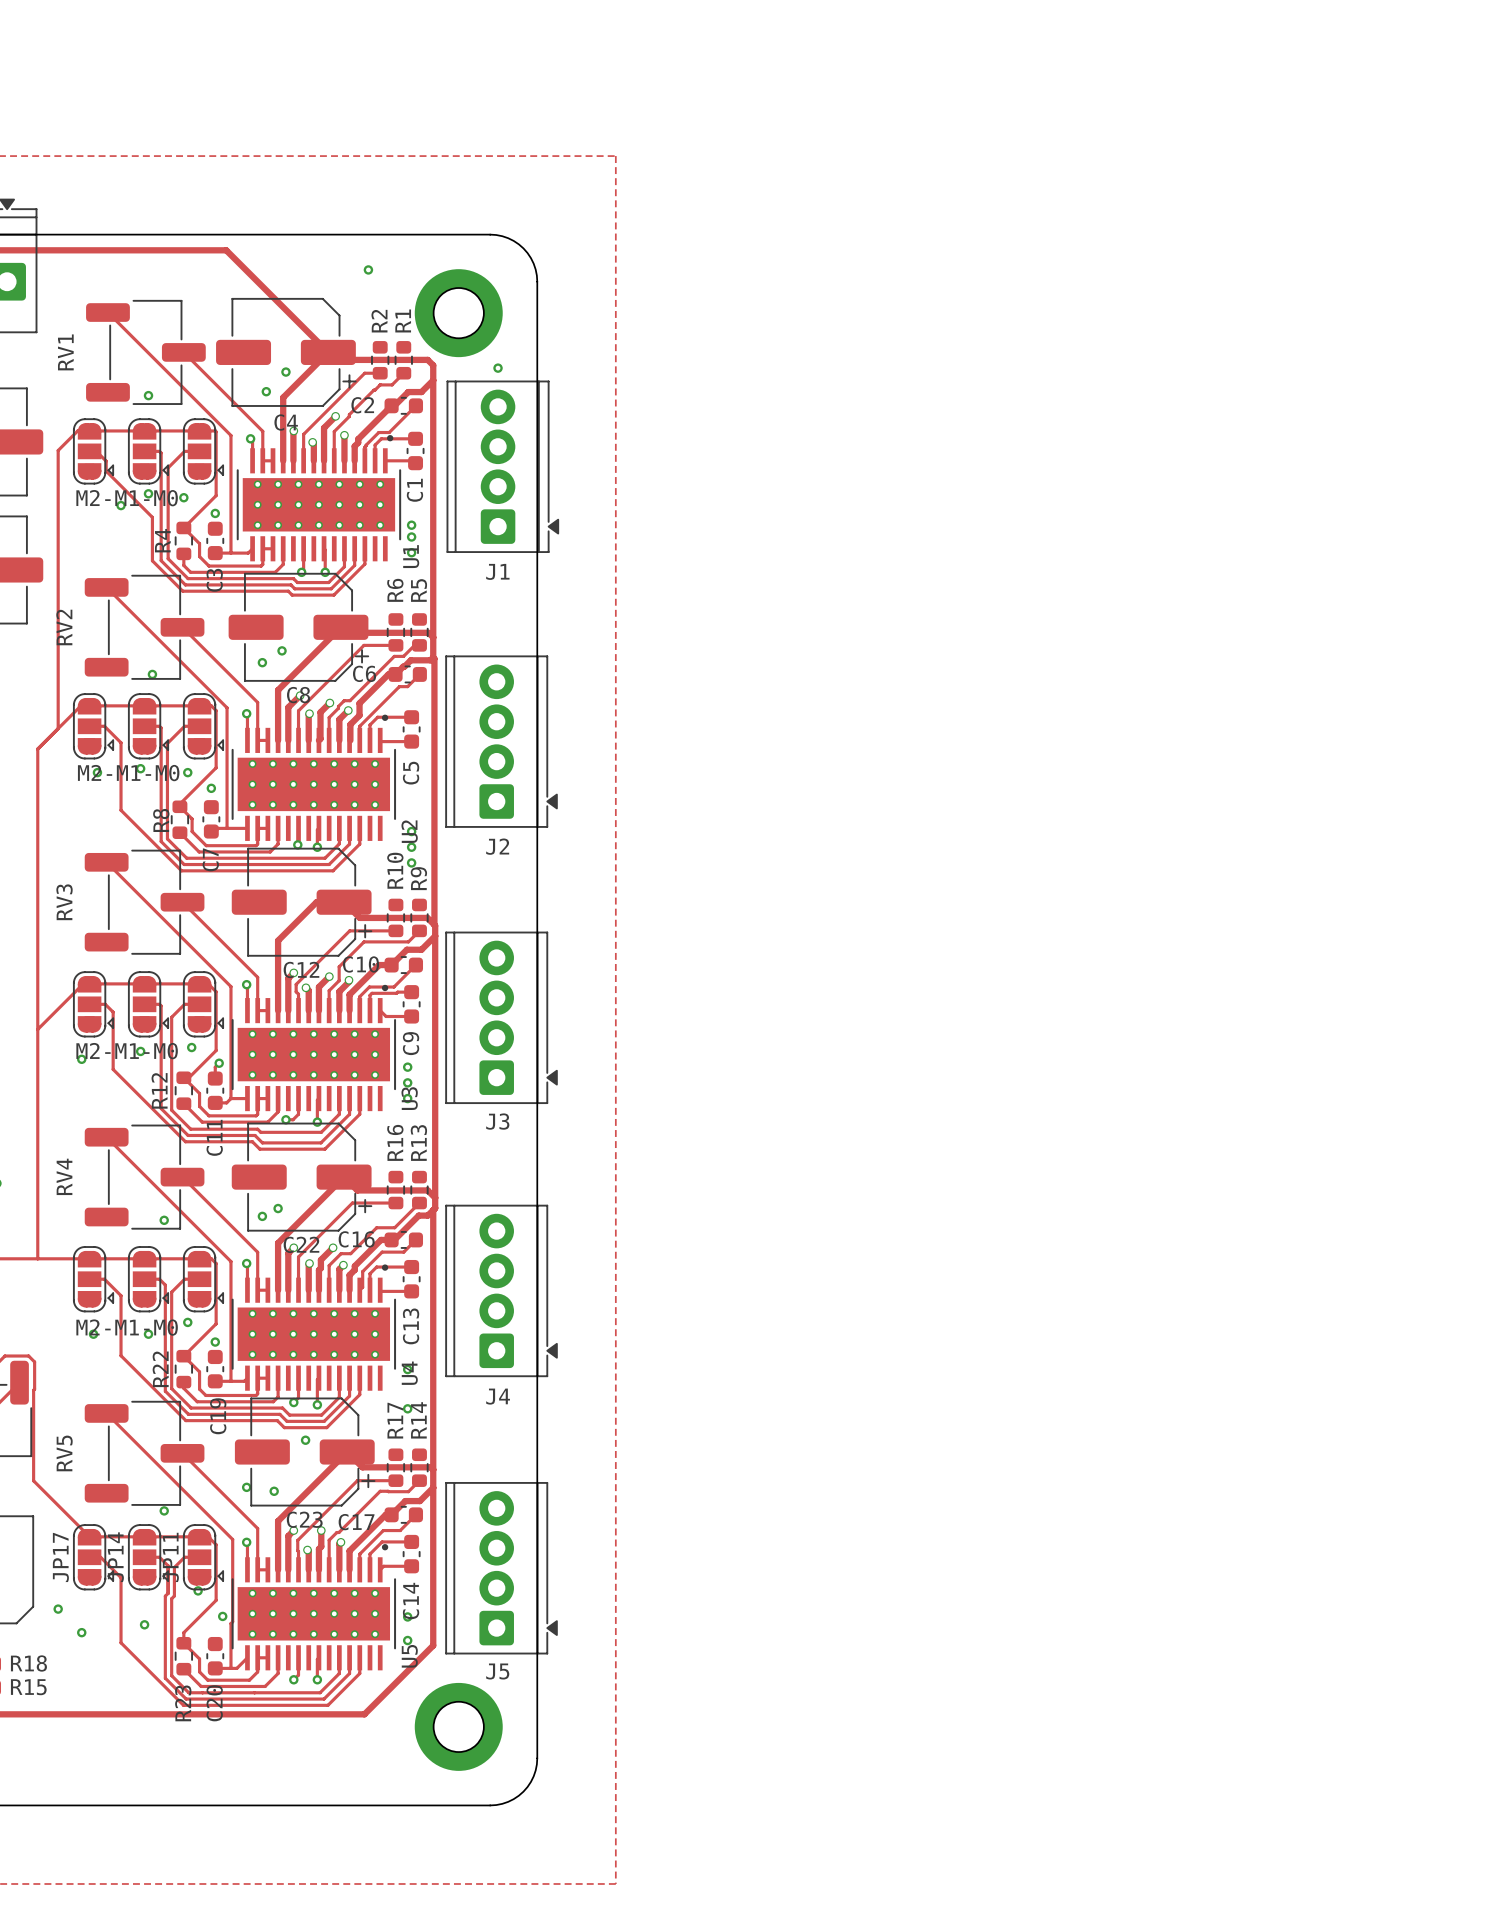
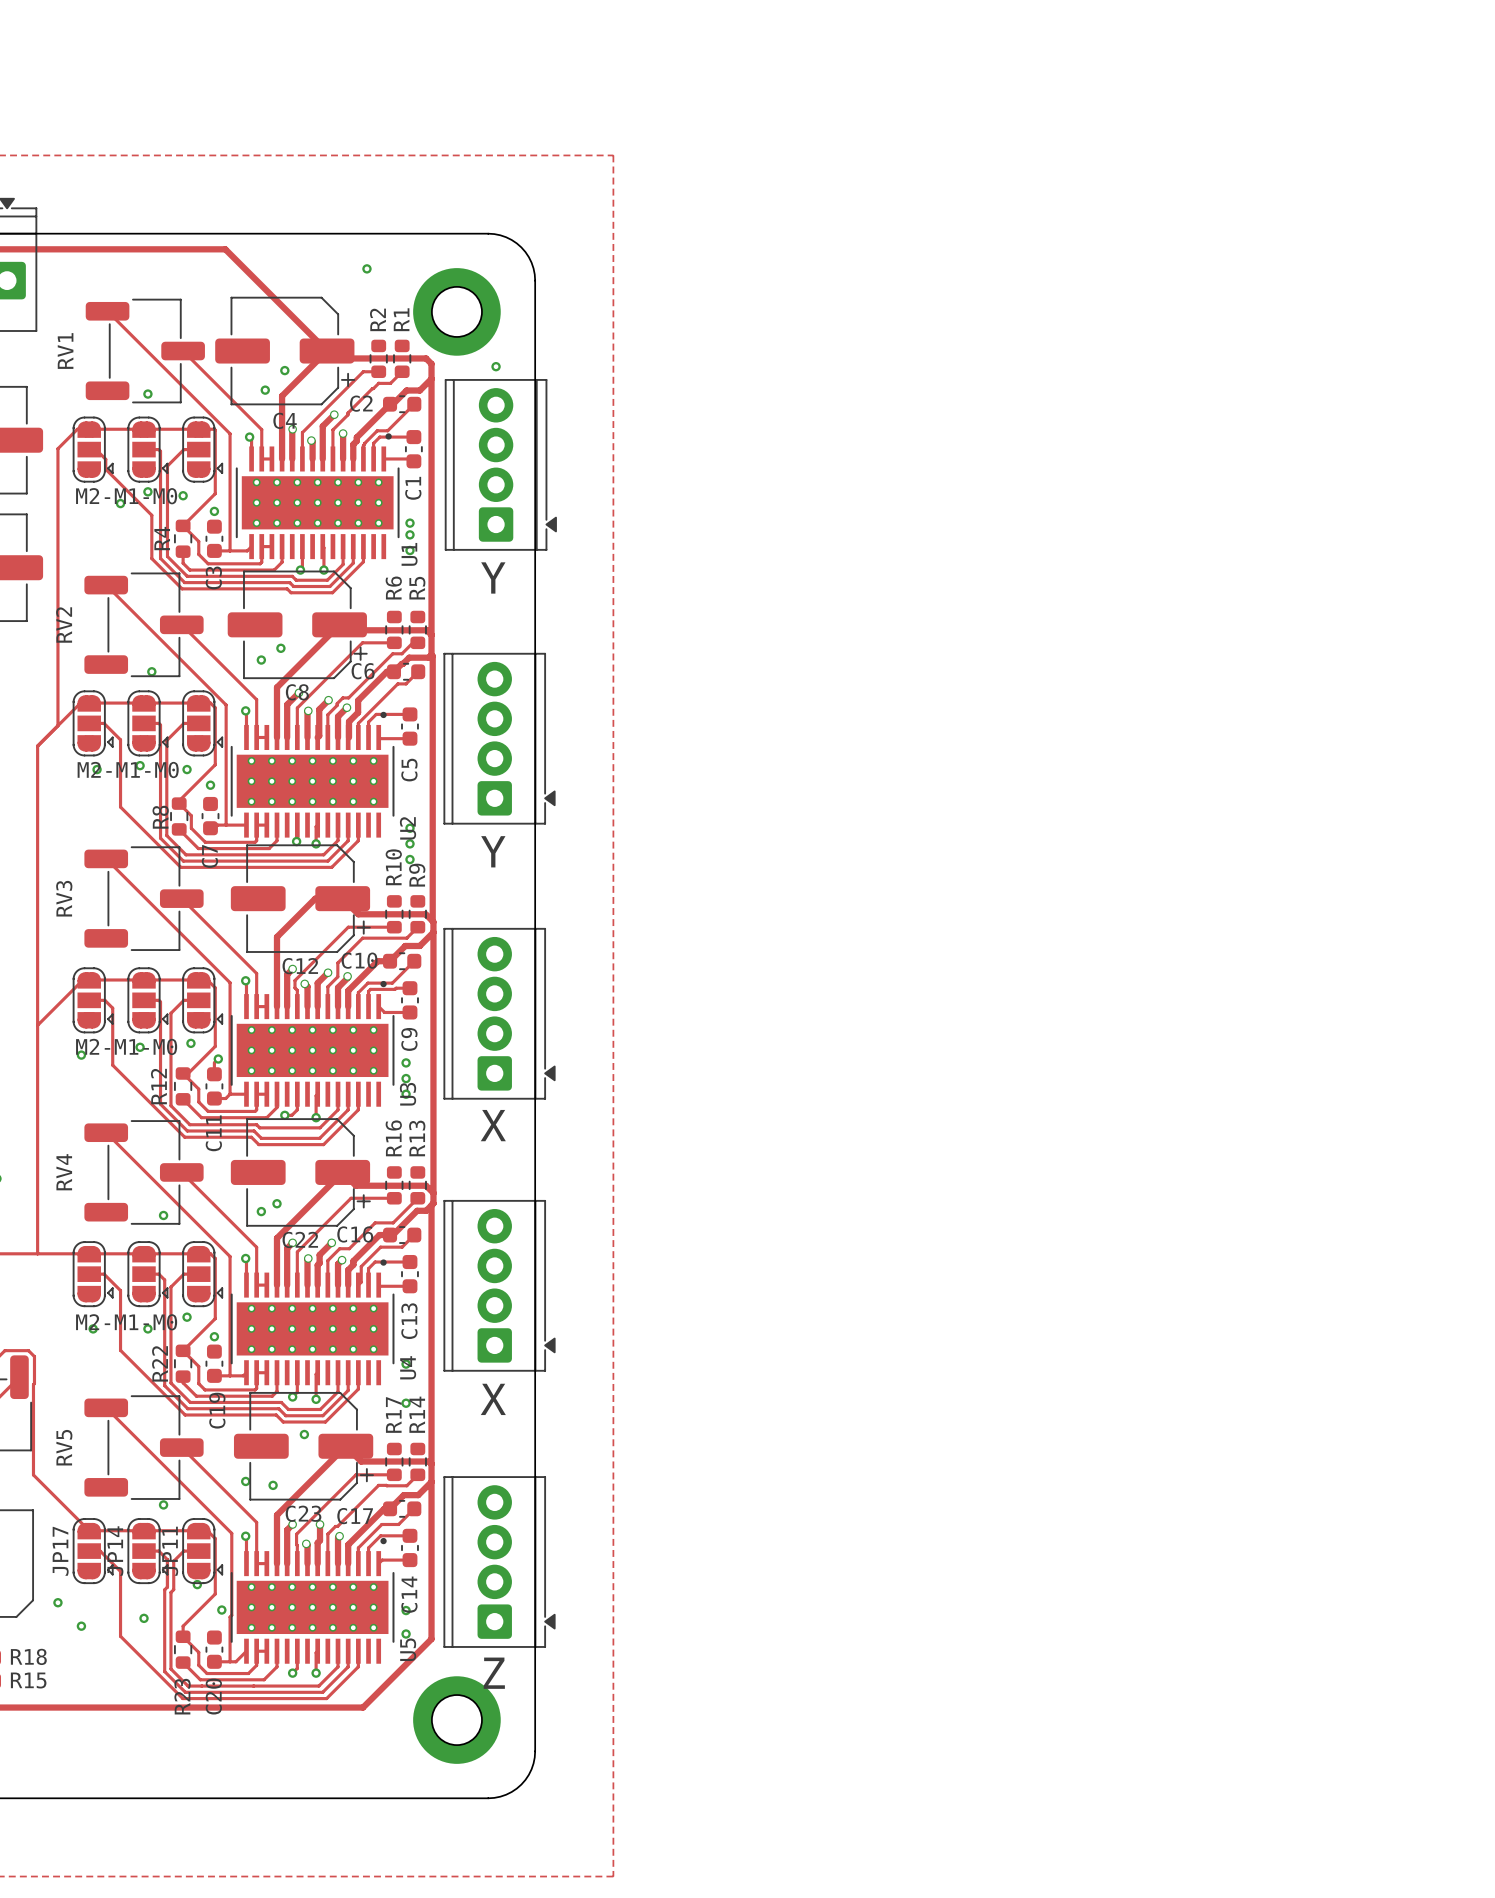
J1 name: J1 (497, 571) -> none
text: none -> Y (493, 577)
J2 name: J2 (497, 846) -> none
text: none -> Y (493, 851)
J3 name: J3 (497, 1121) -> none
text: none -> X (493, 1125)
J4 name: J4 (498, 1396) -> none
text: none -> X (493, 1399)
J5 name: J5 (497, 1671) -> none
text: none -> Z (494, 1673)

